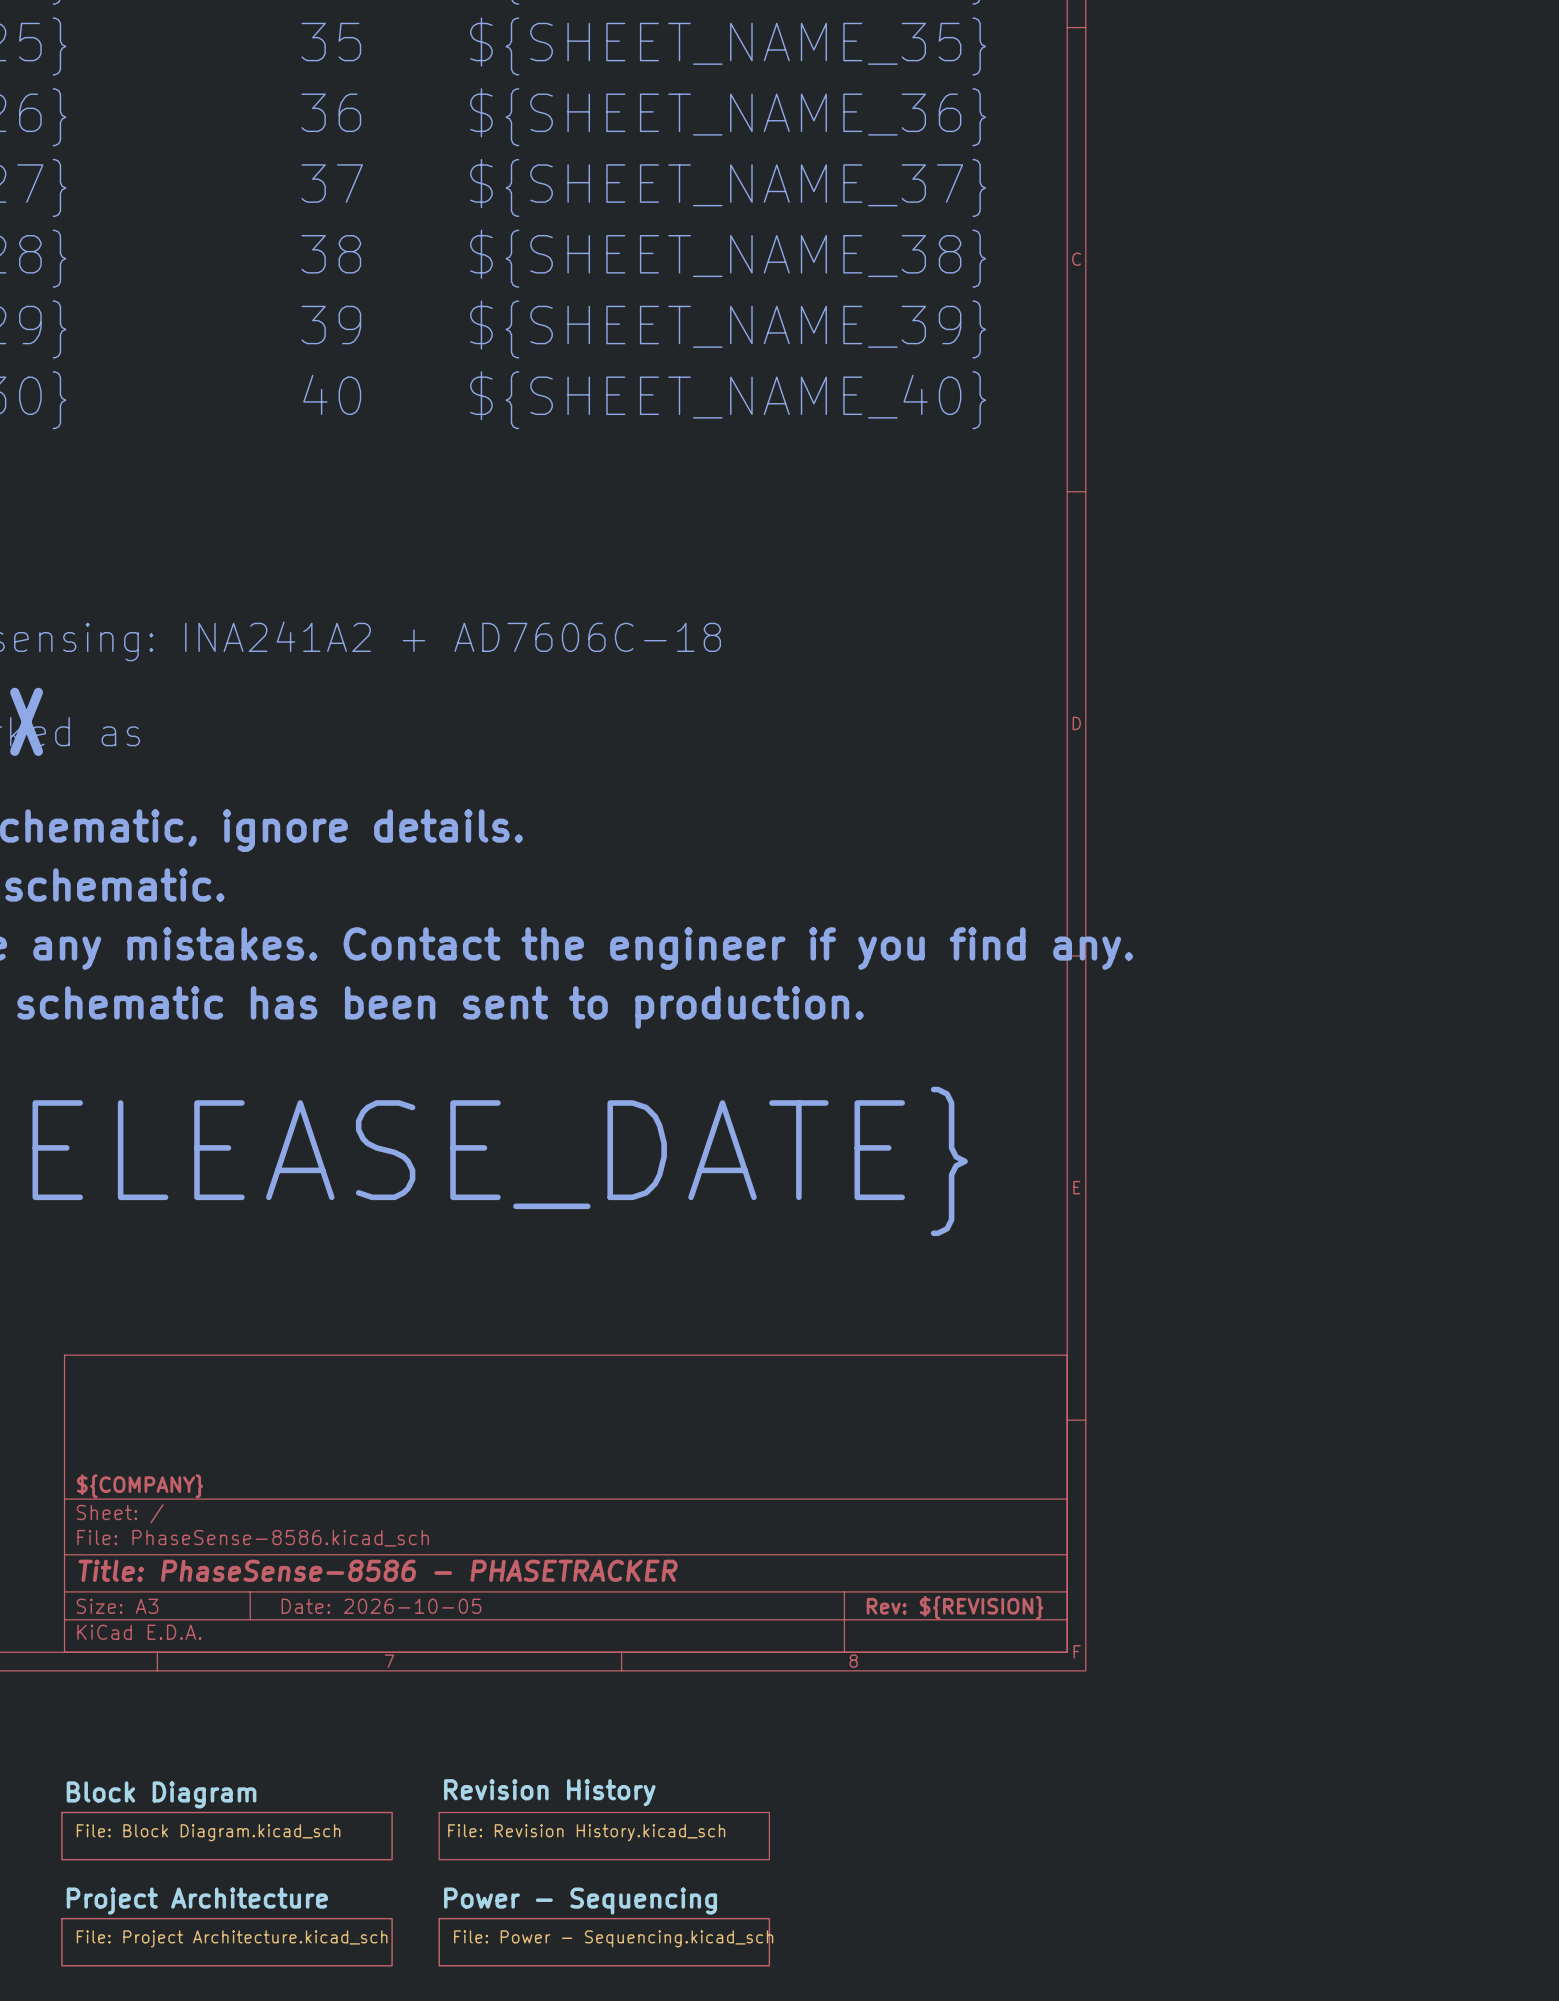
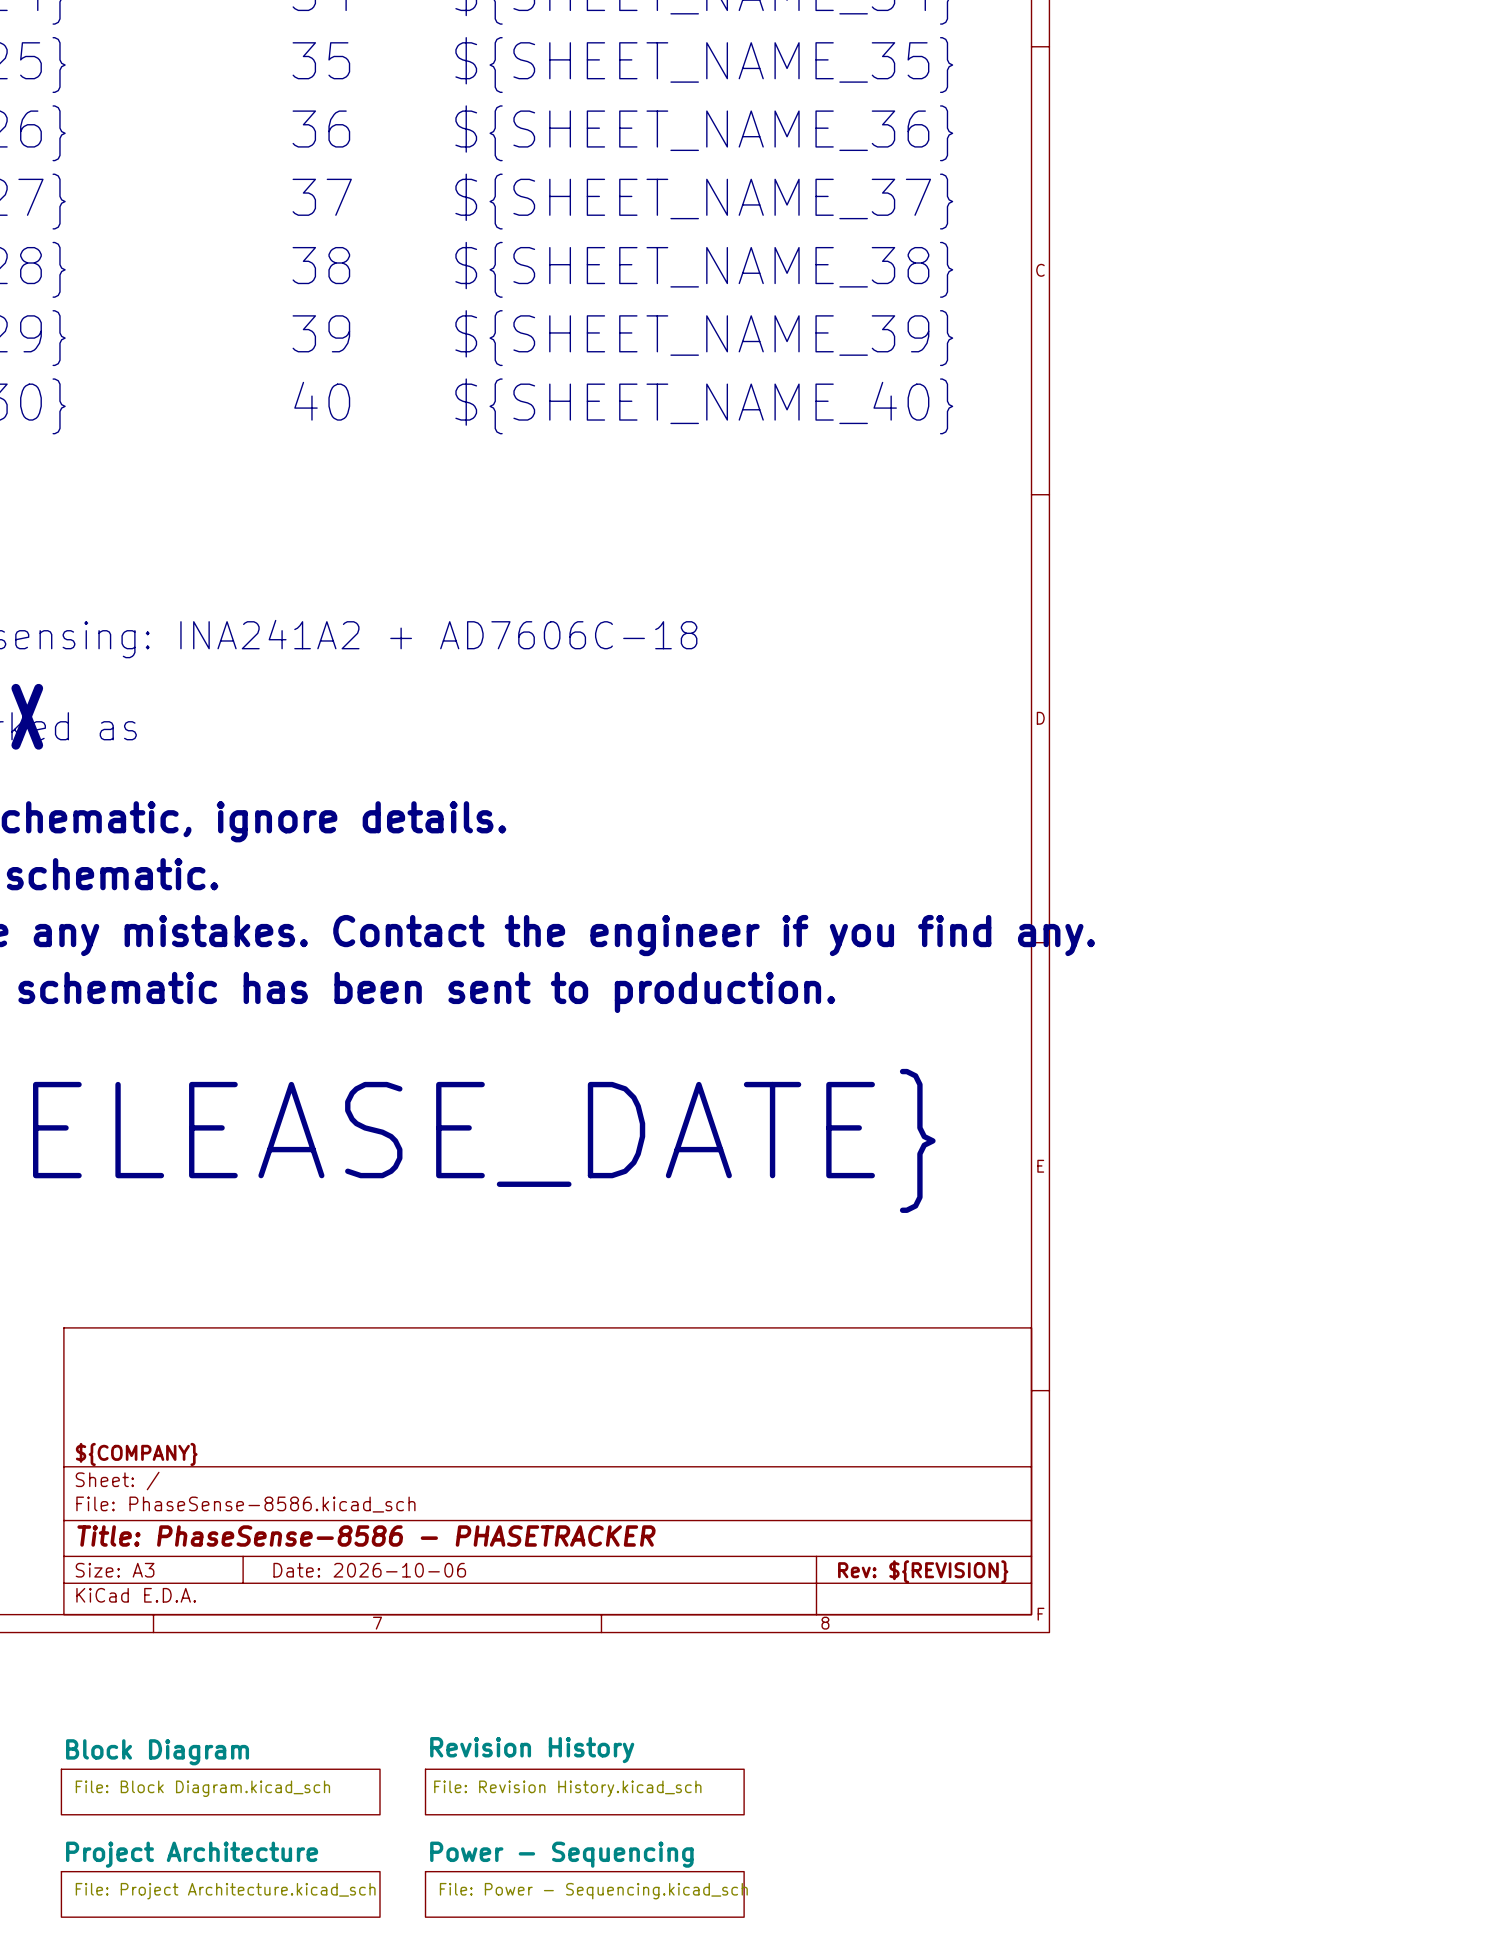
title block: Date: 2026-10-05 (381, 1606) -> Date: 2026-10-06 (369, 1570)

